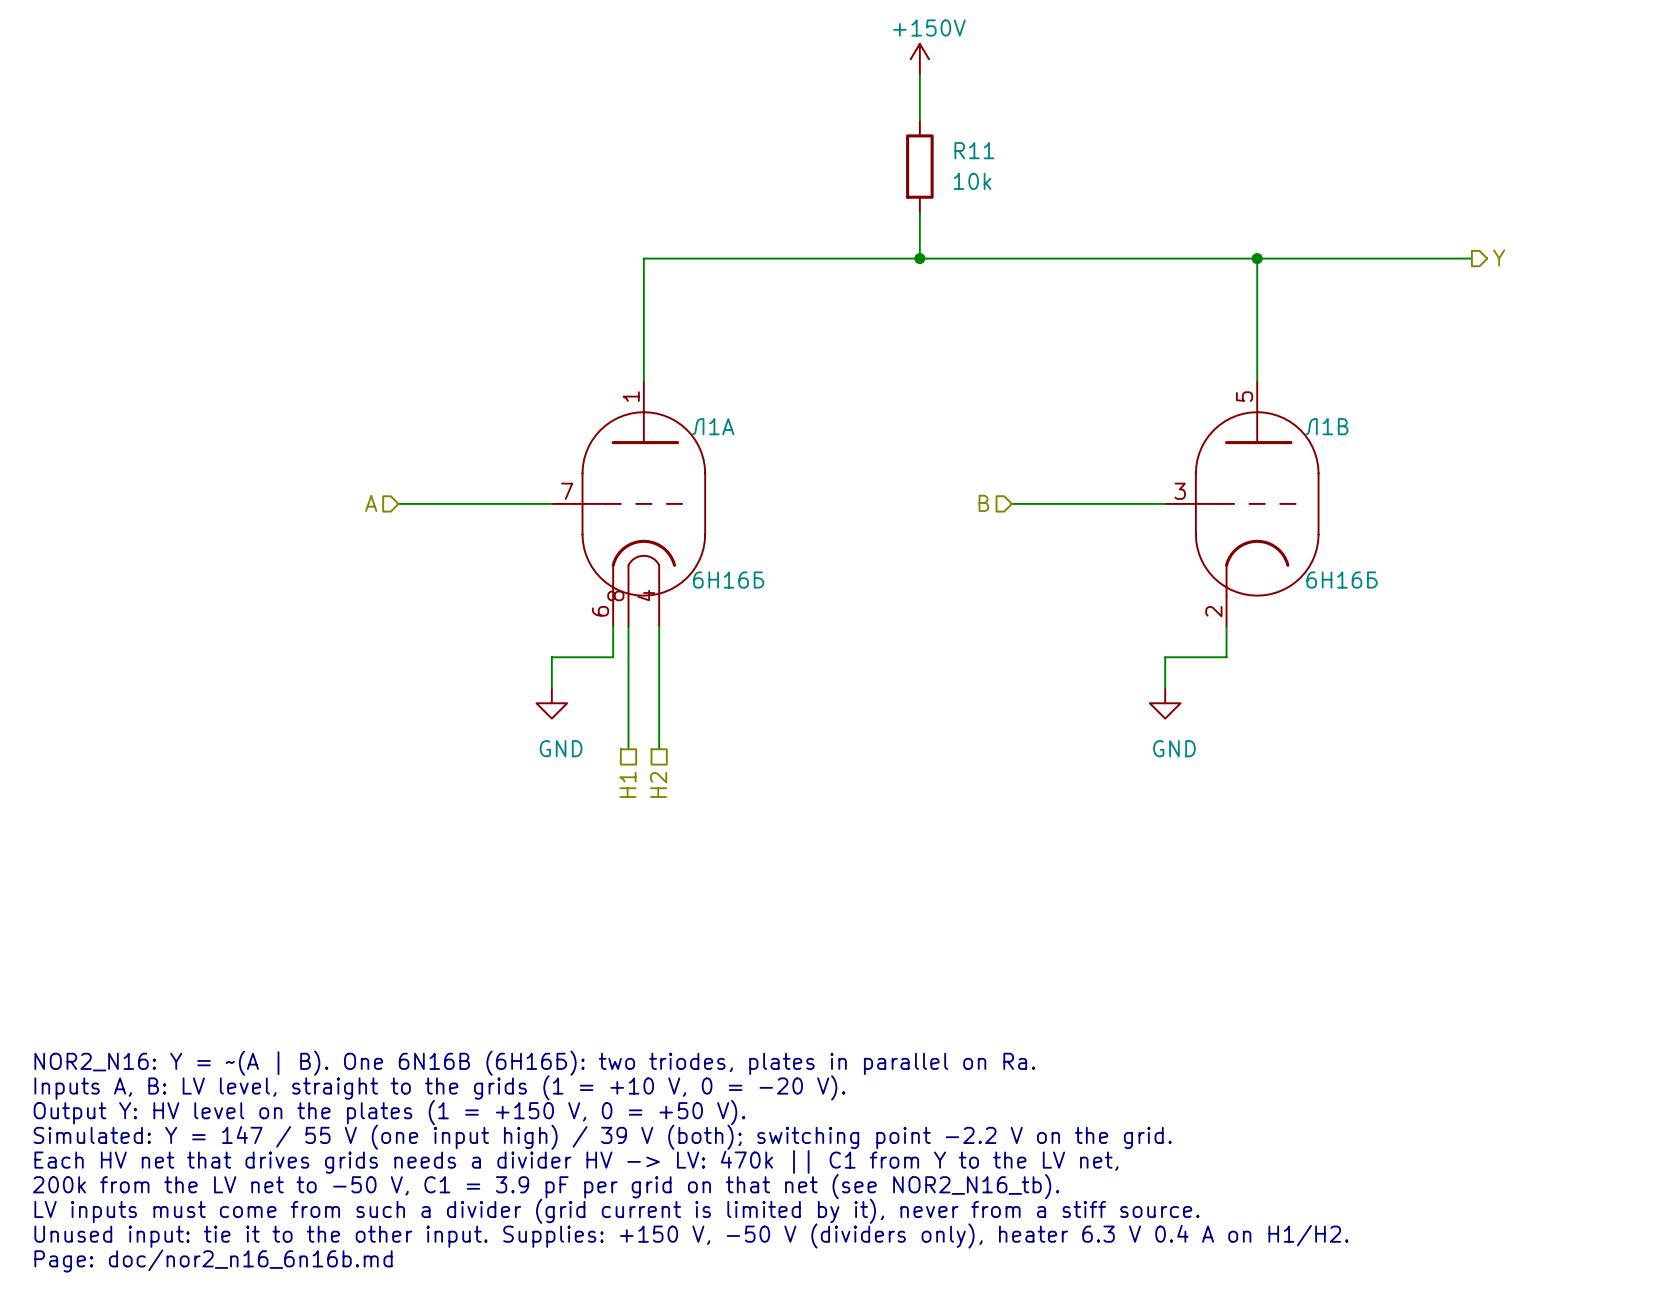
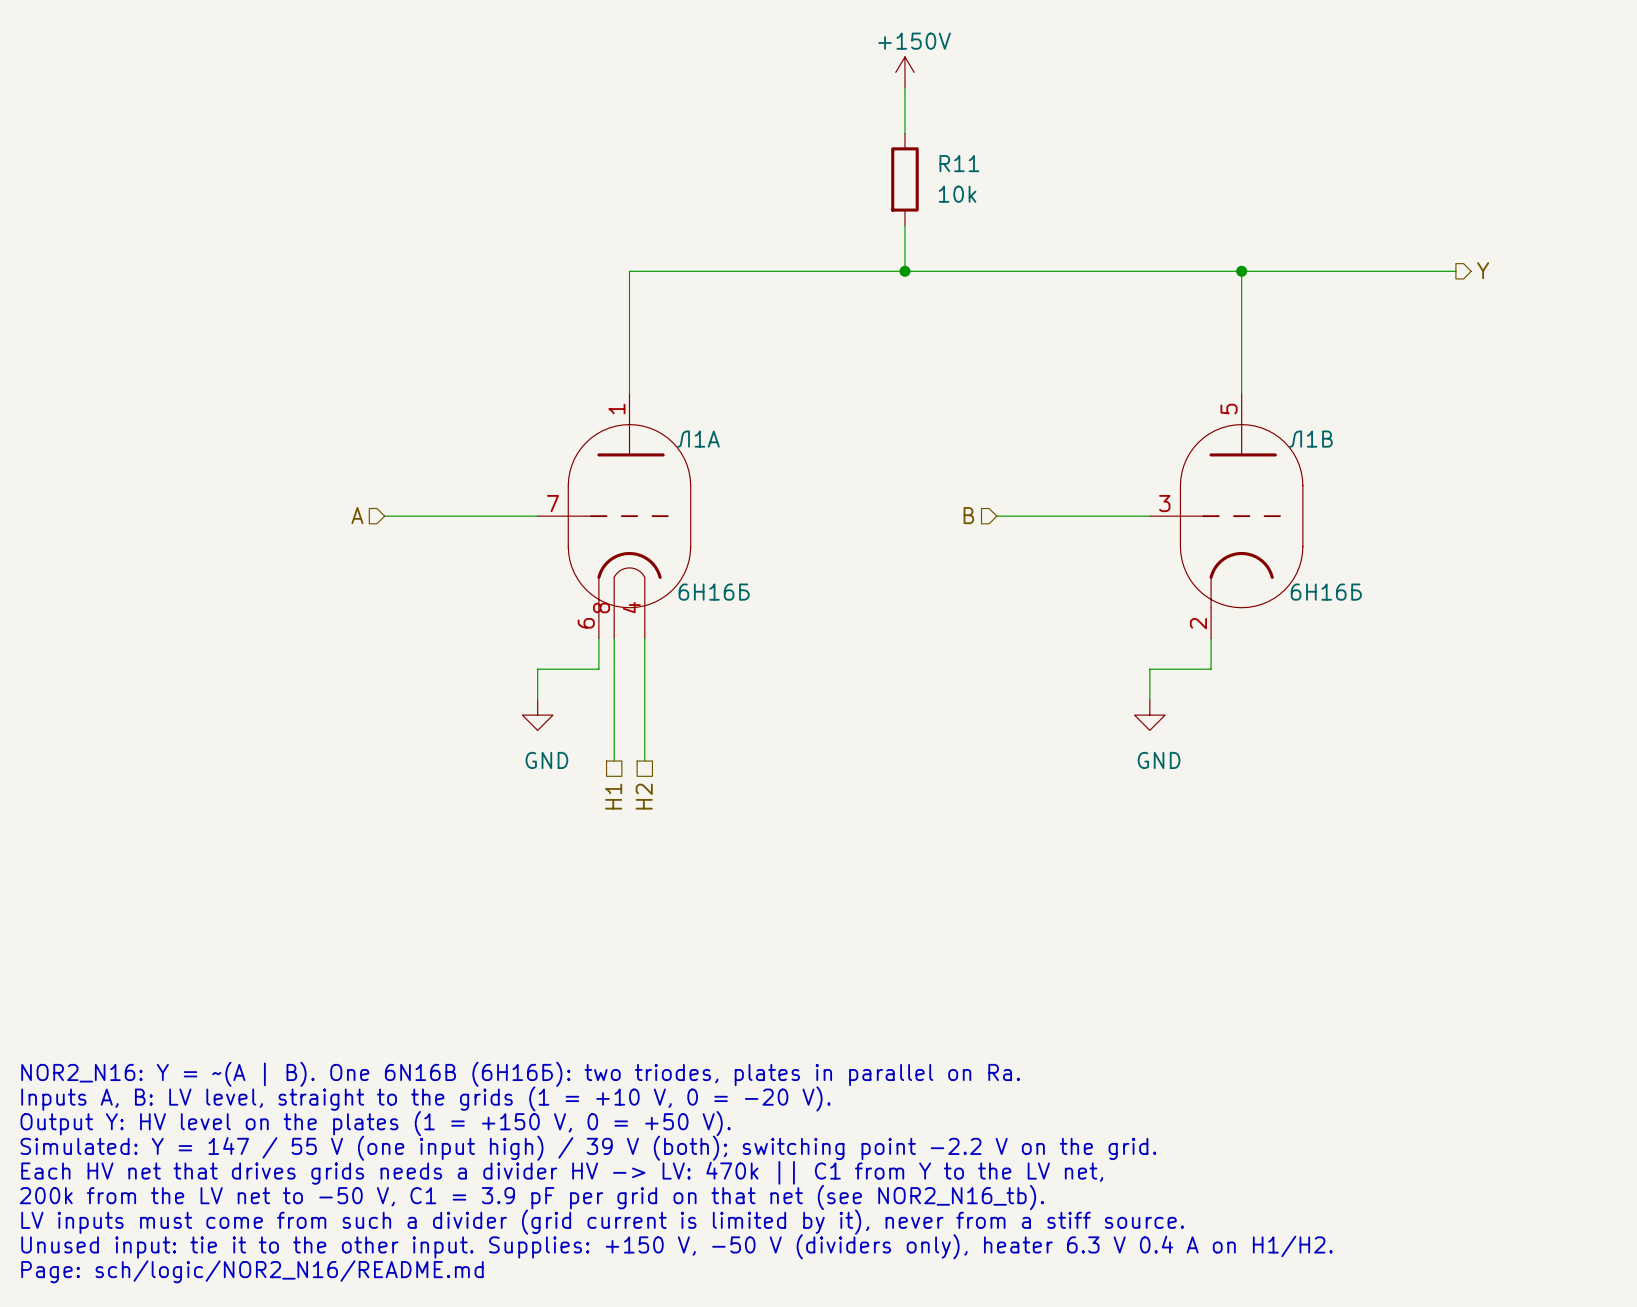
text: Page: doc/nor2_n16_6n16b.md (213, 1261) -> Page: sch/logic/NOR2_N16/README.md (252, 1271)

